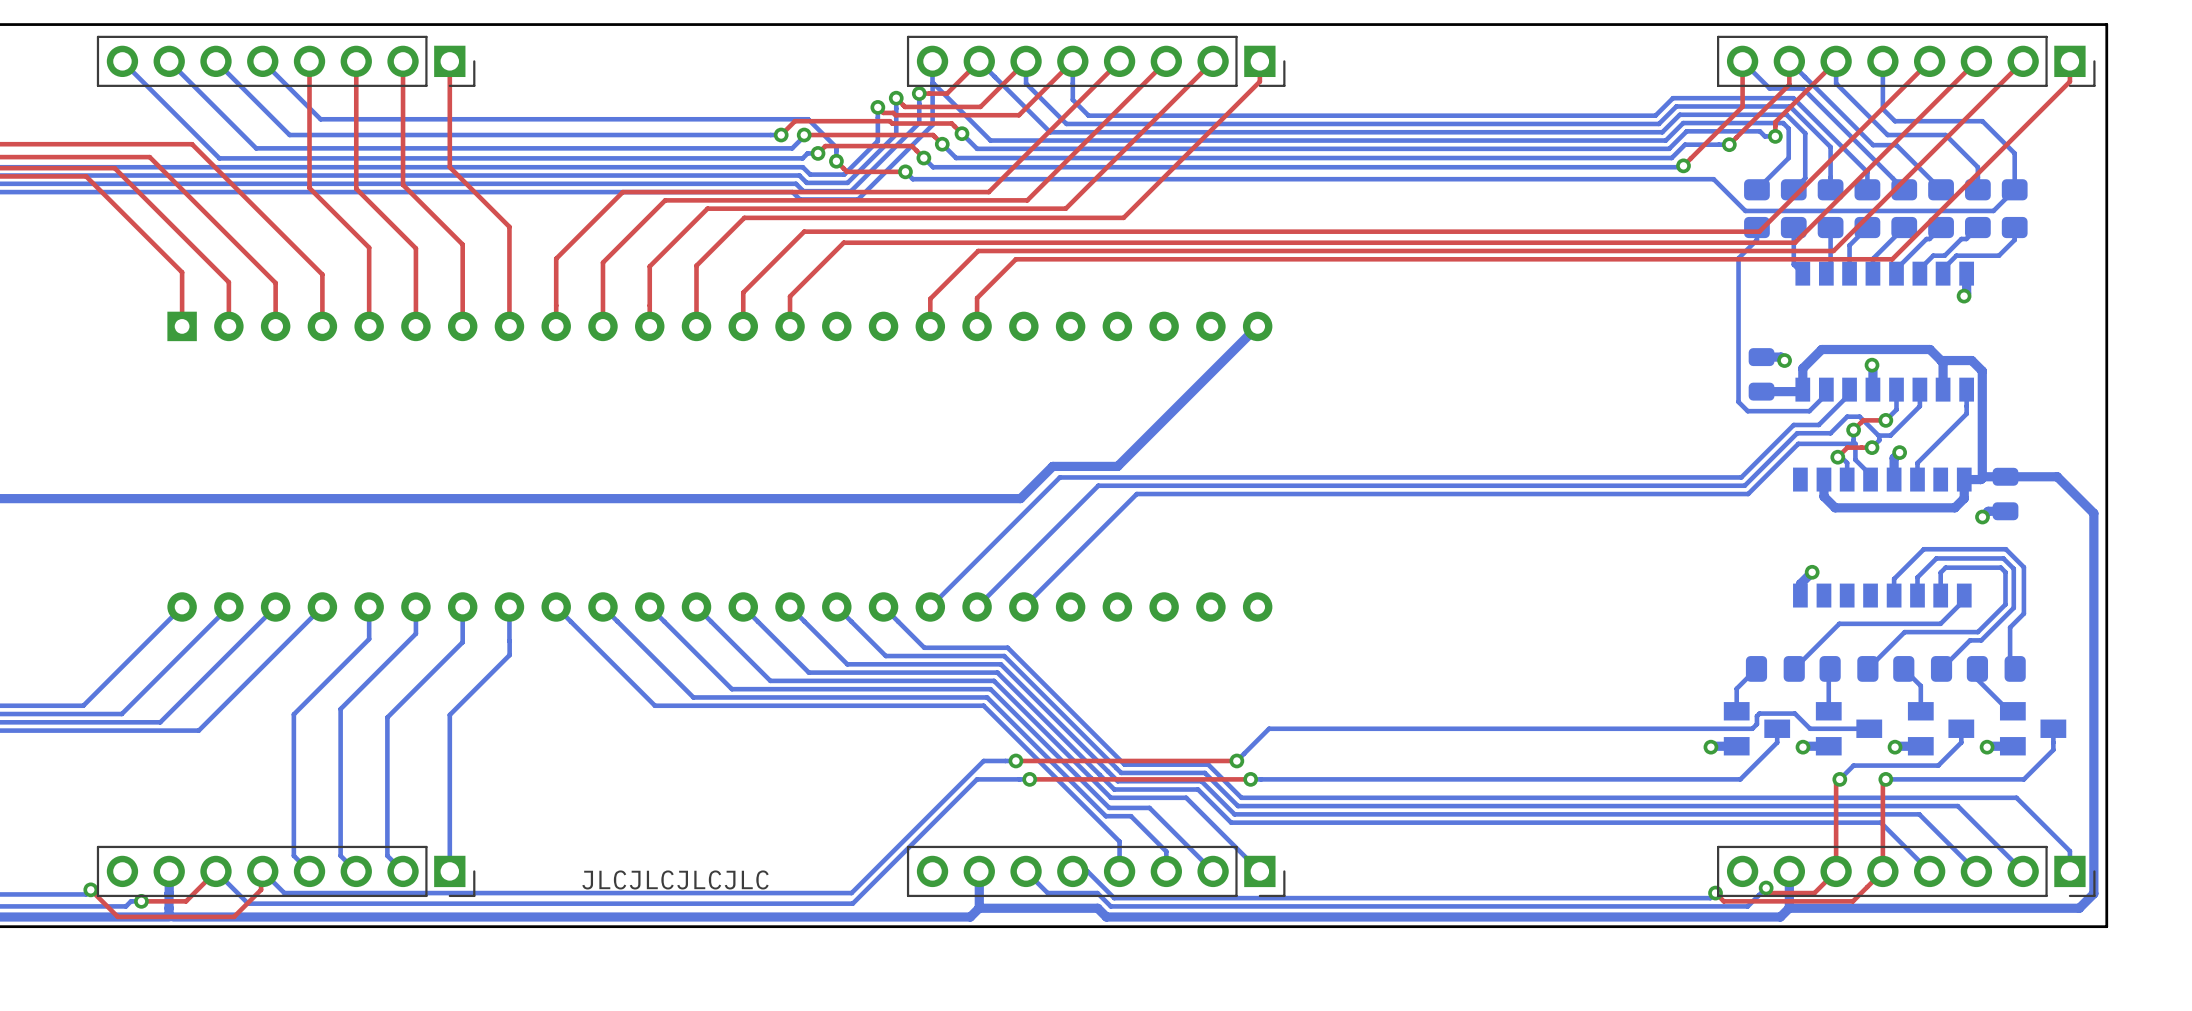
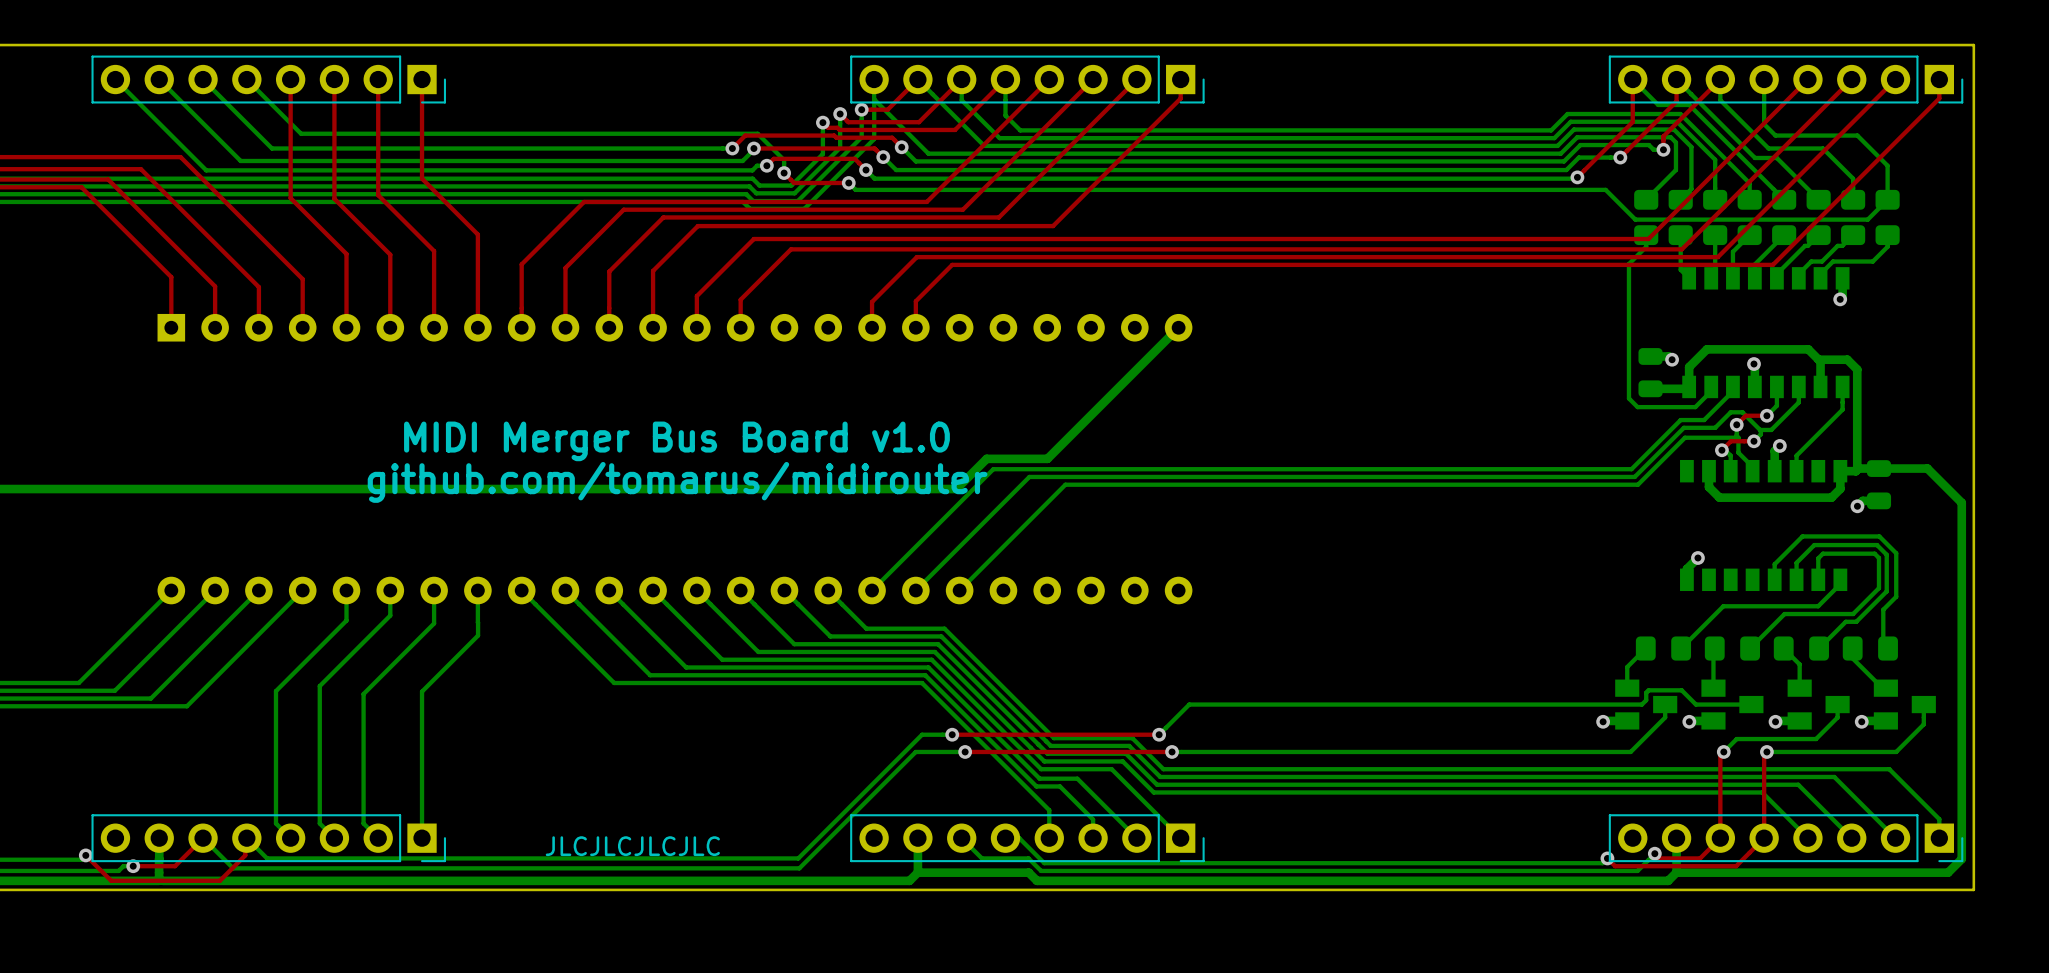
text: none -> MIDI Merger Bus Board v1.0 (676, 441)
text: none -> github.com/tomarus/midirouter (677, 482)

